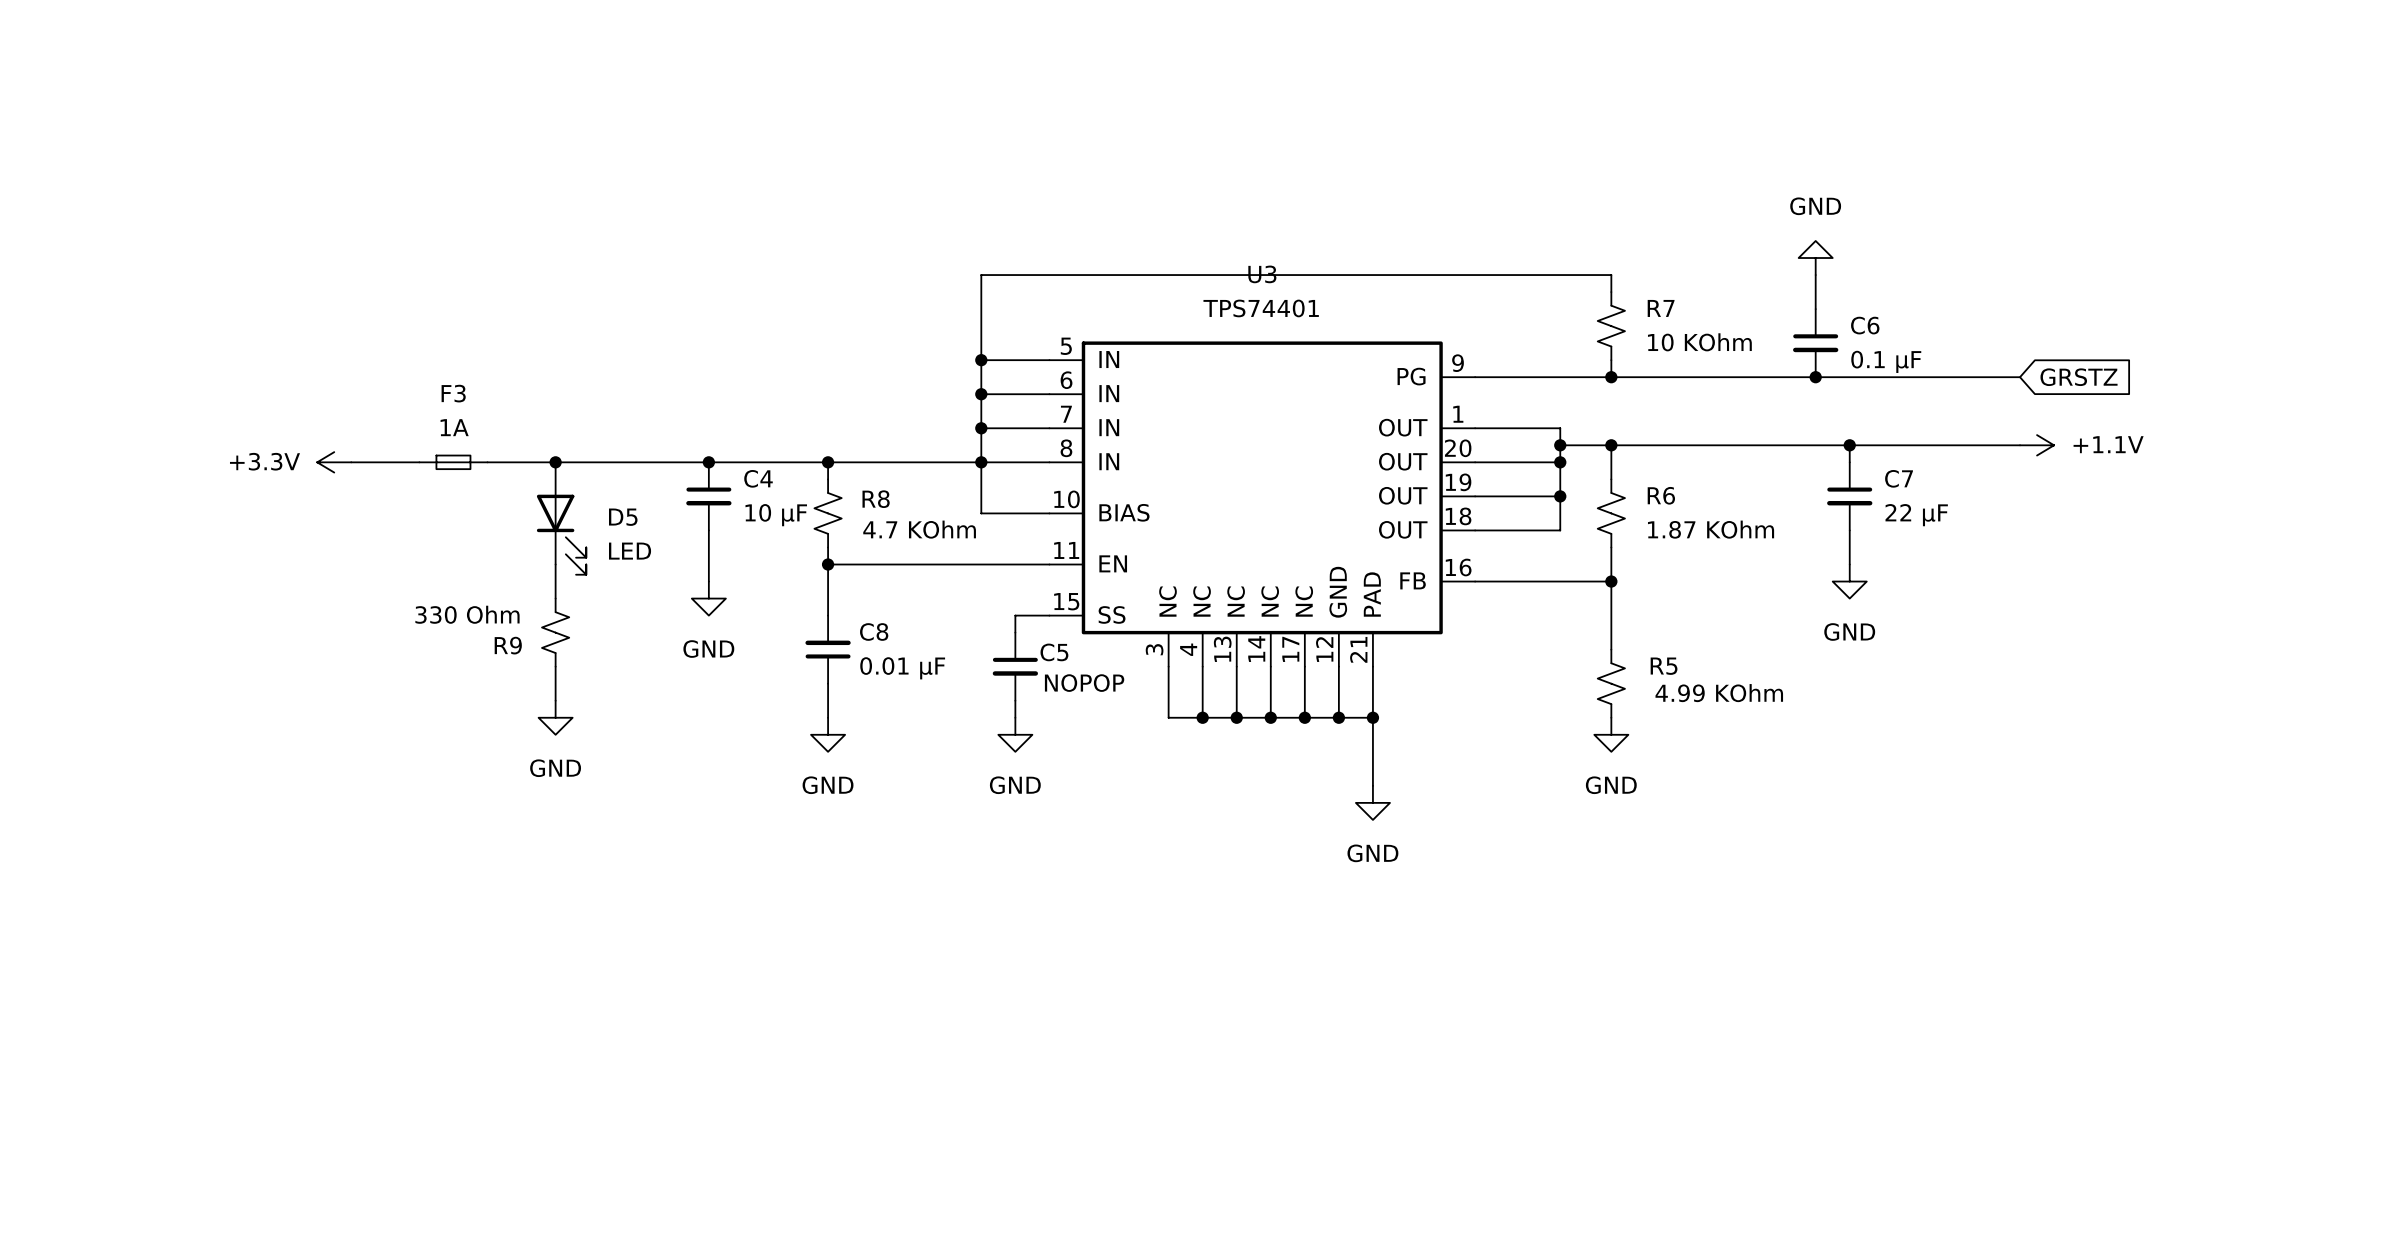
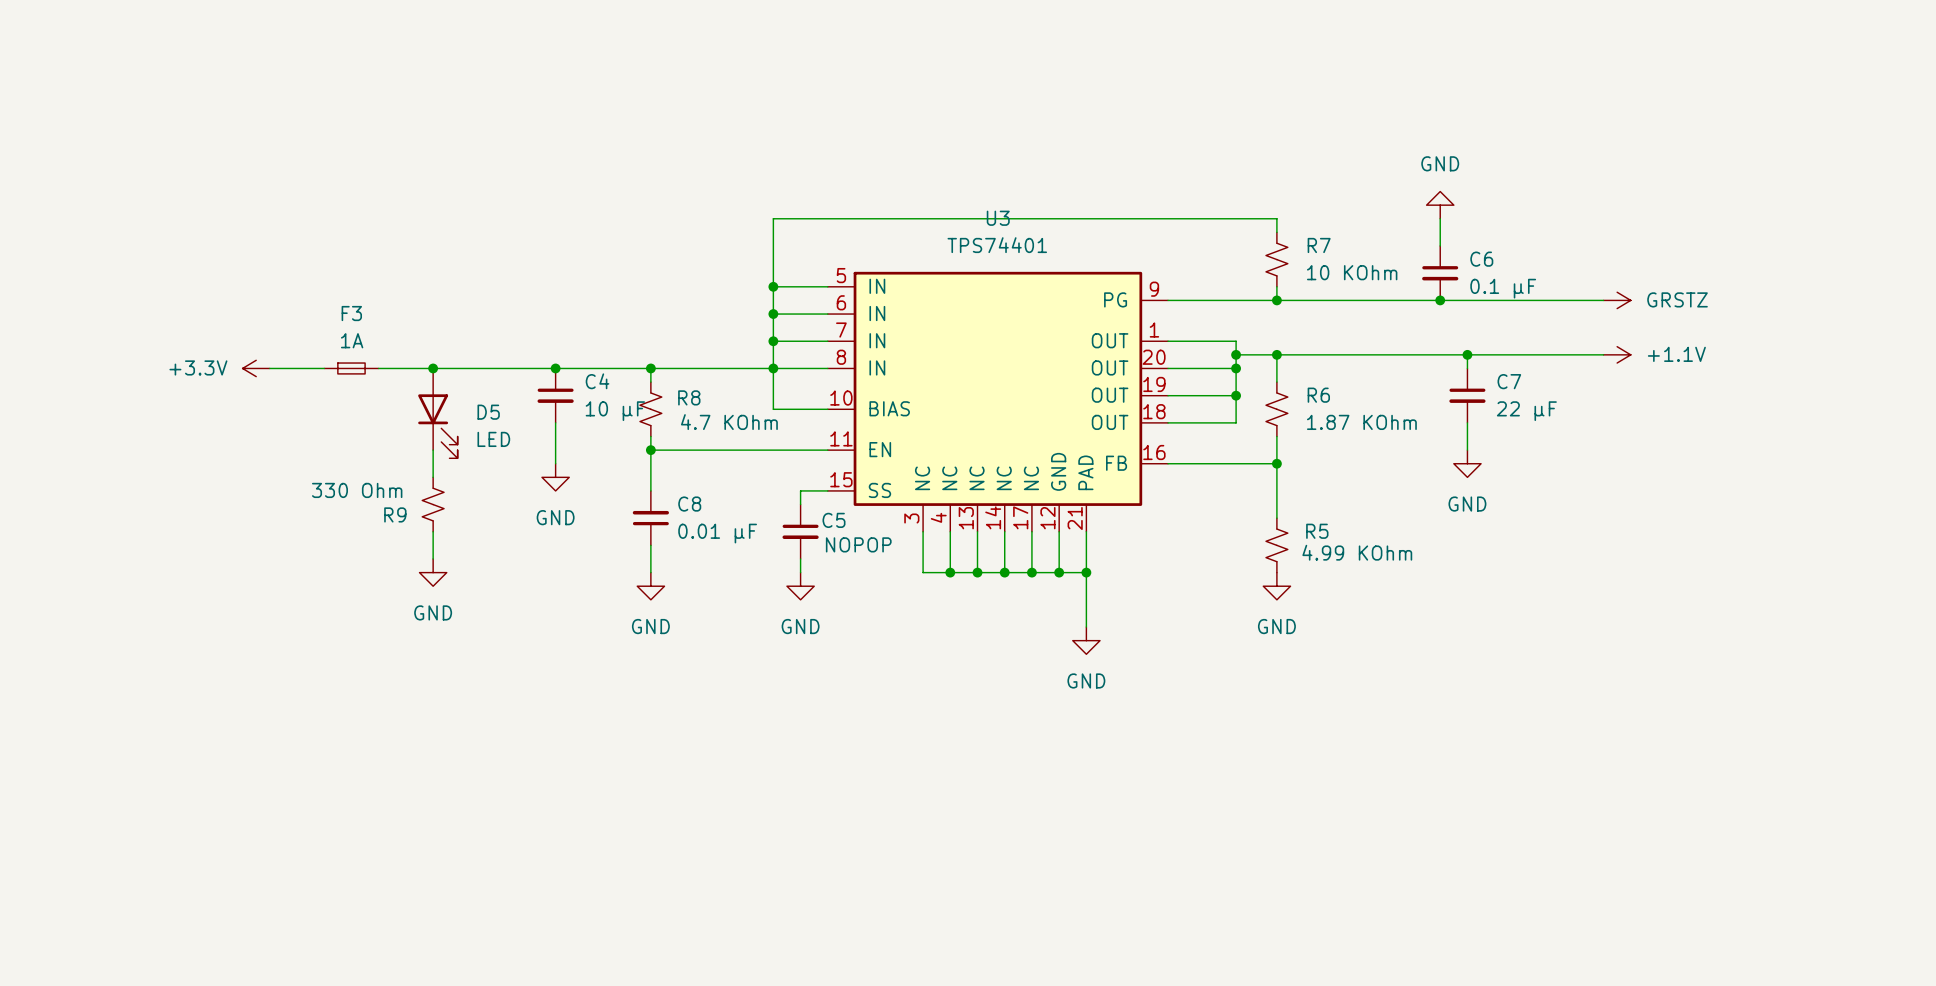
power symbol: none -> GRSTZ (1617, 300)
global label: GRSTZ (2079, 377) -> none

